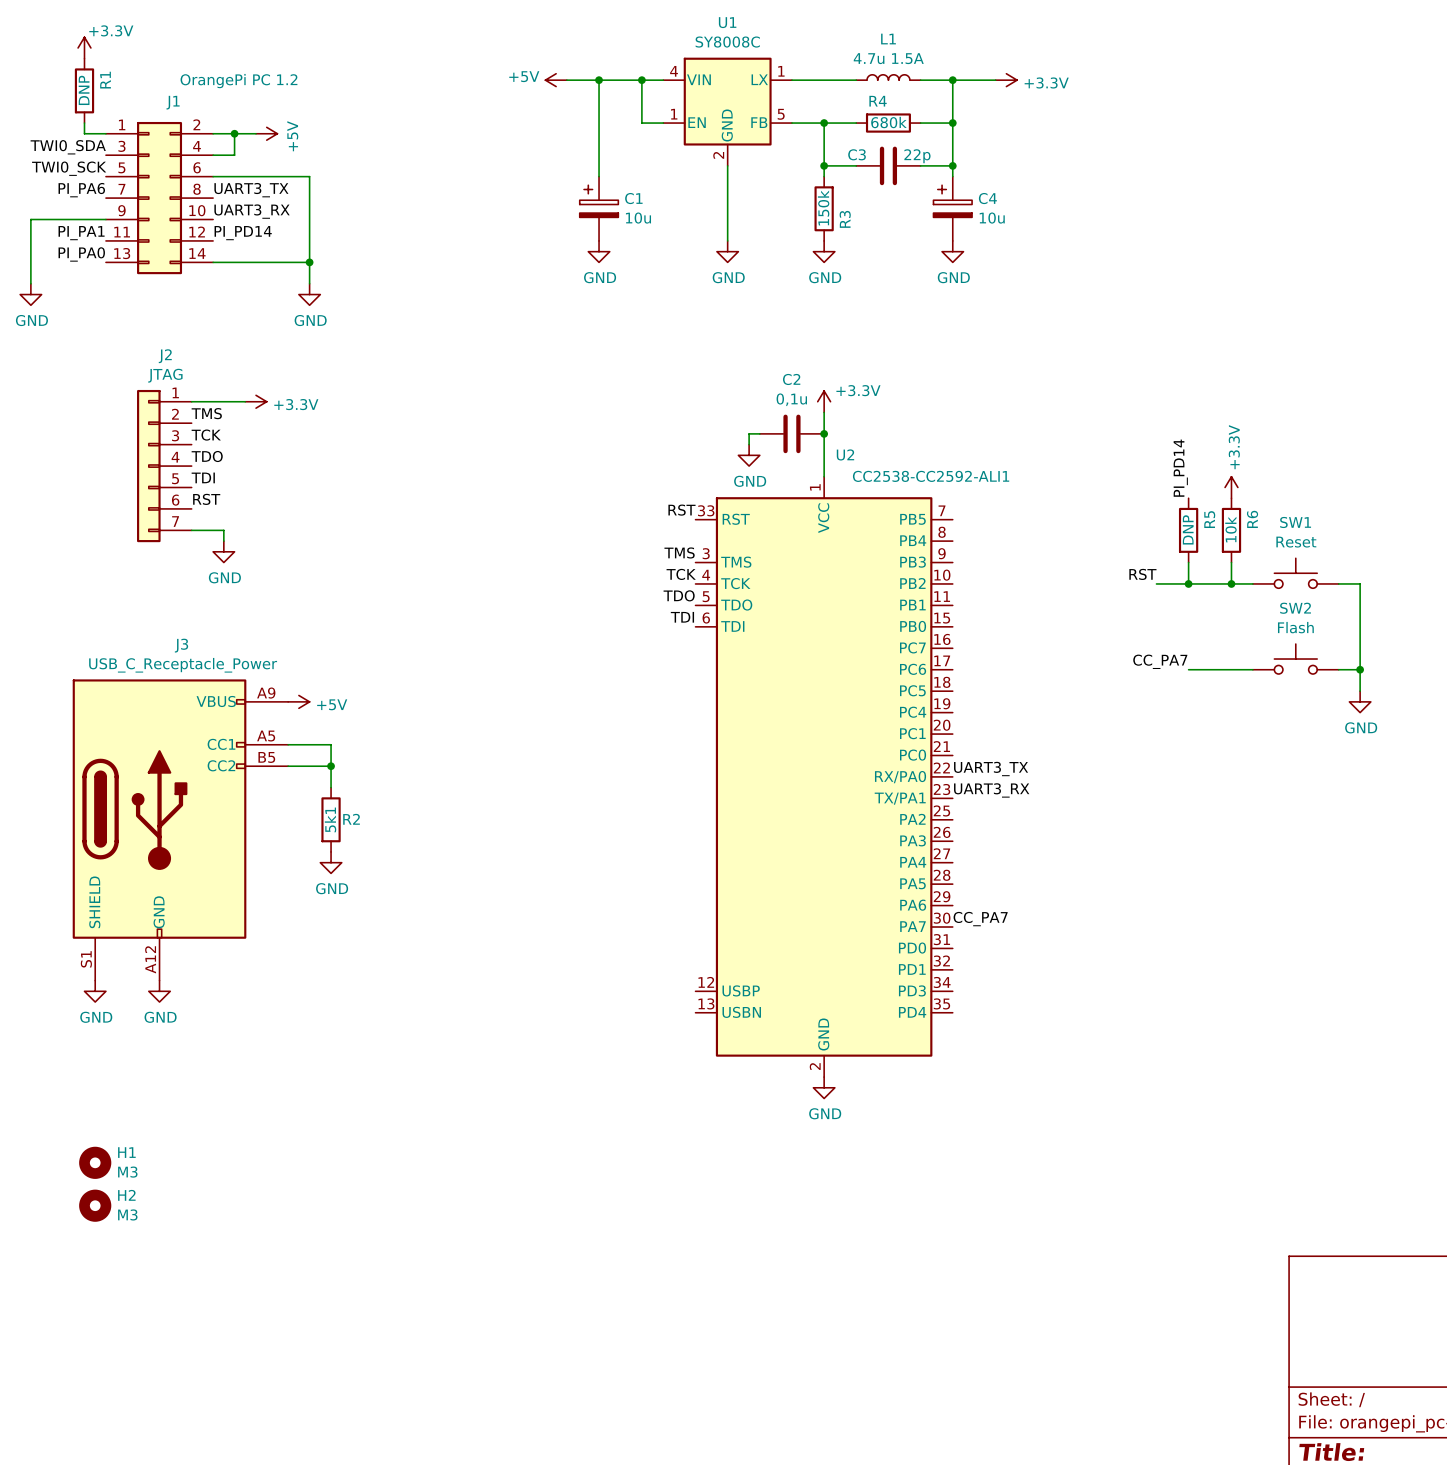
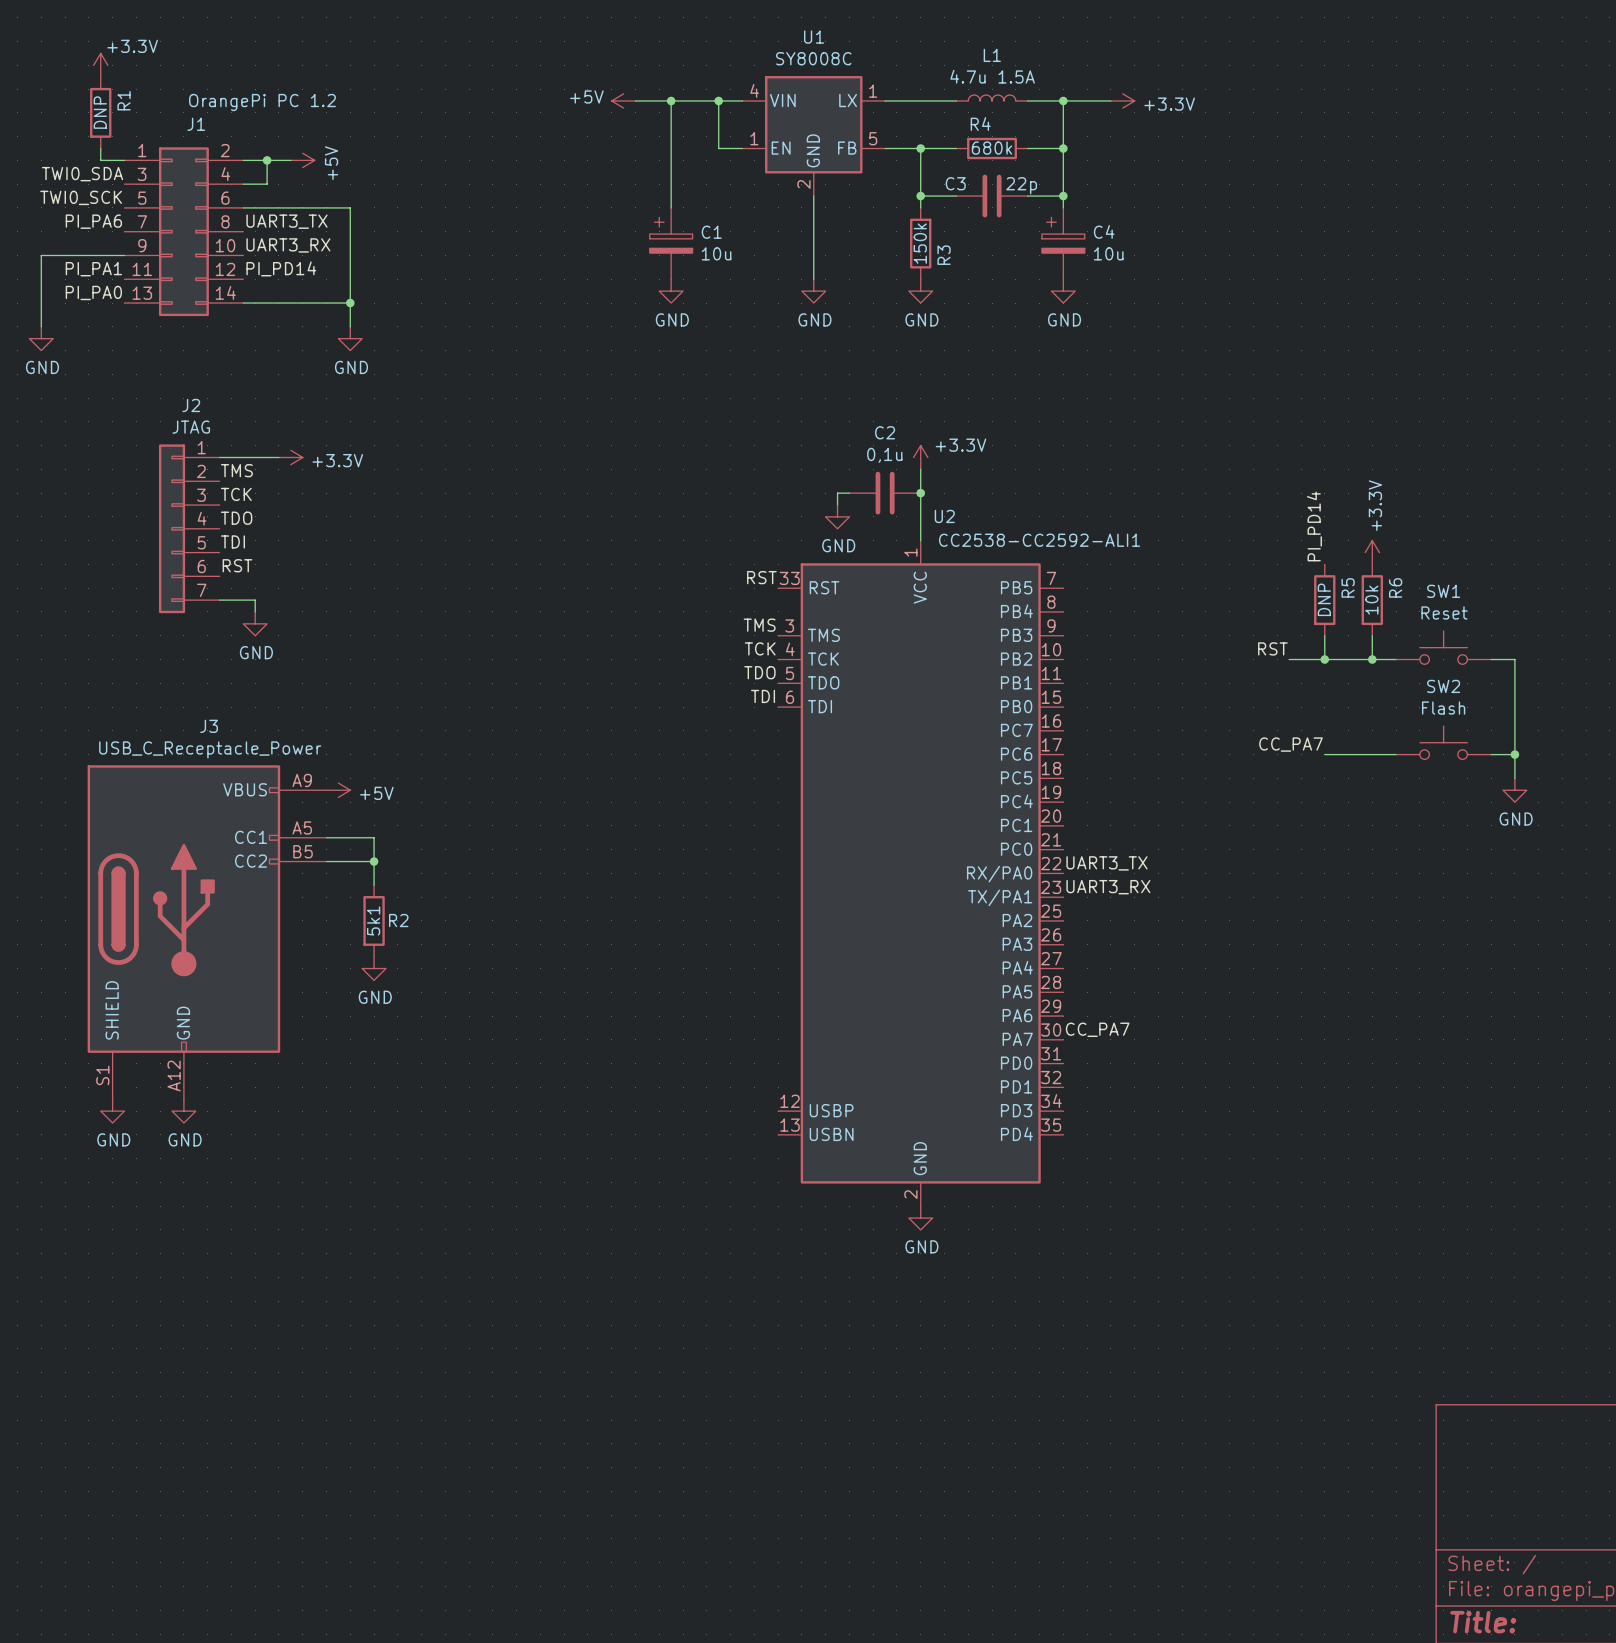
H1: M3 (95, 1162) -> none
H2: M3 (95, 1205) -> none

